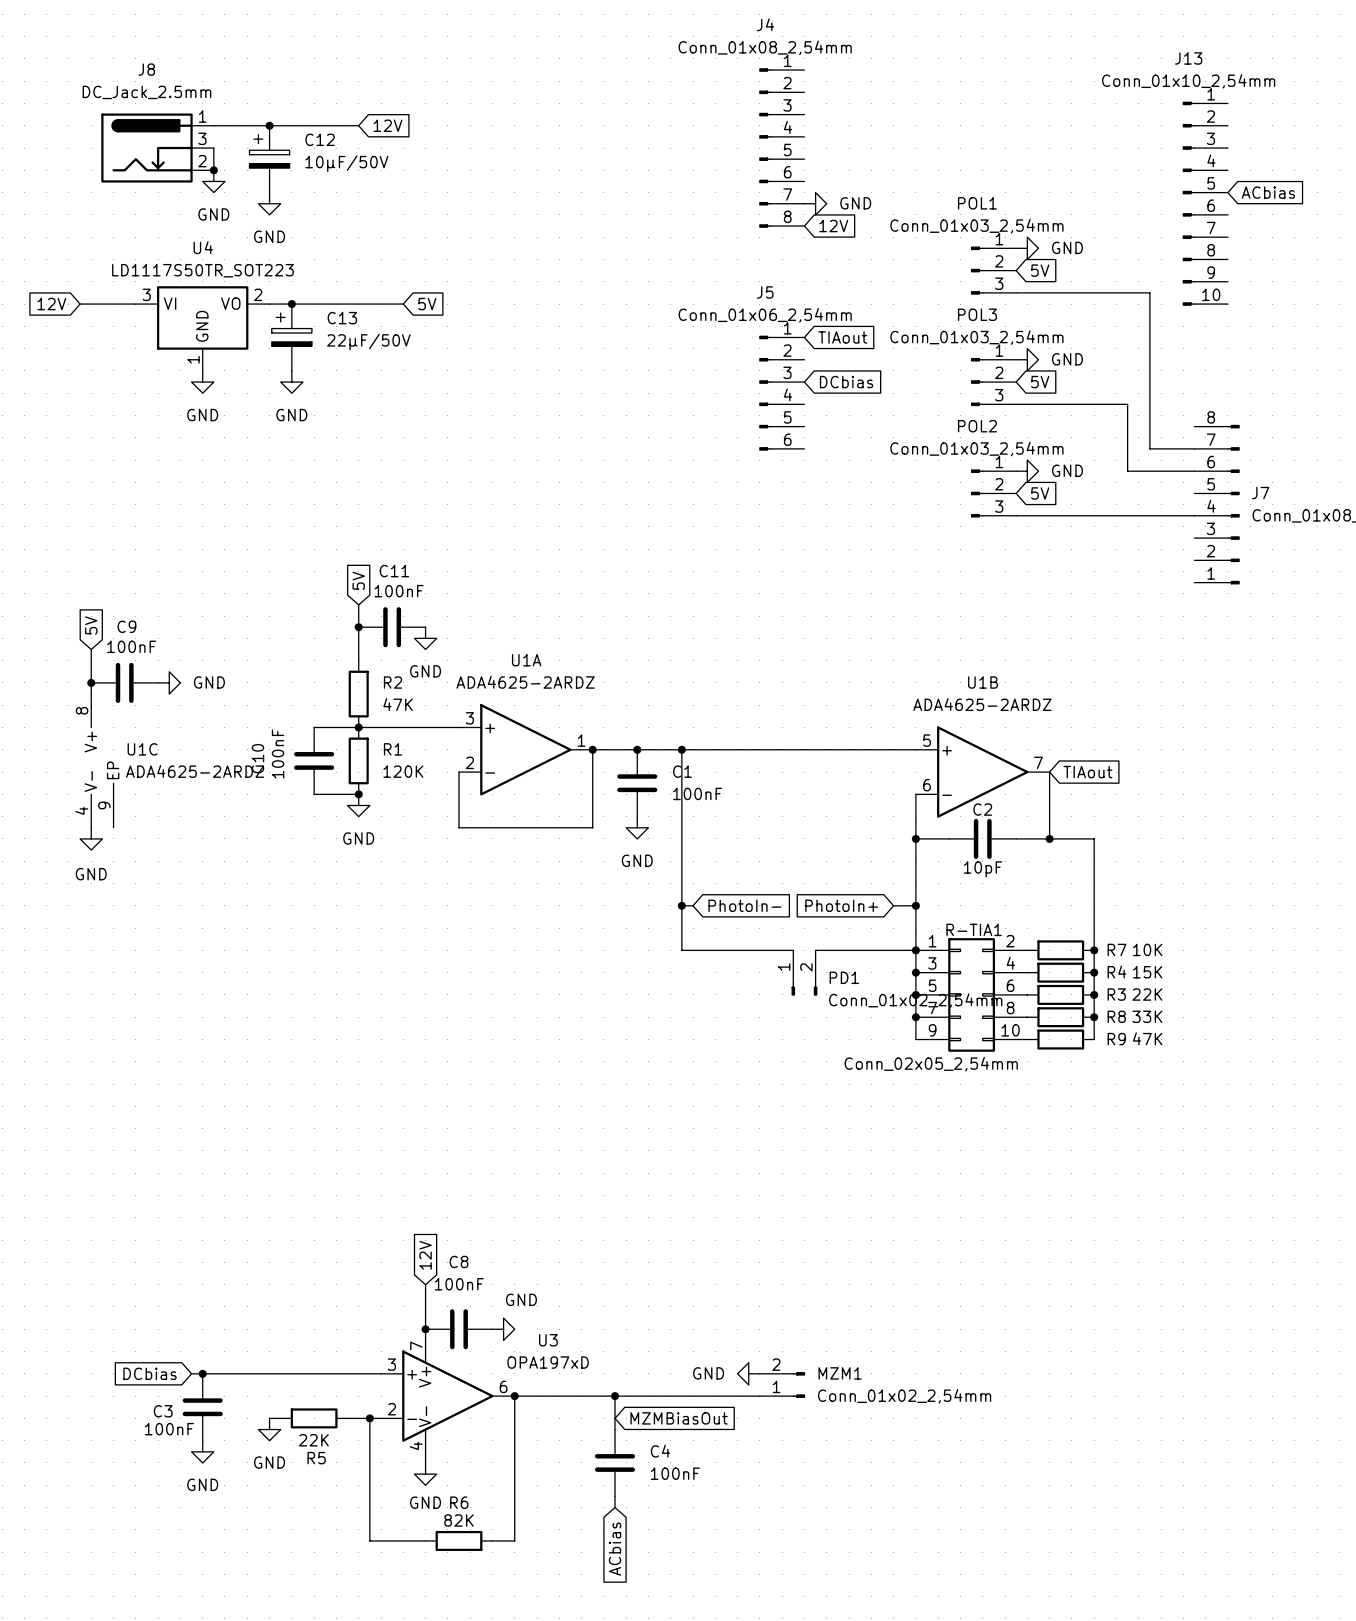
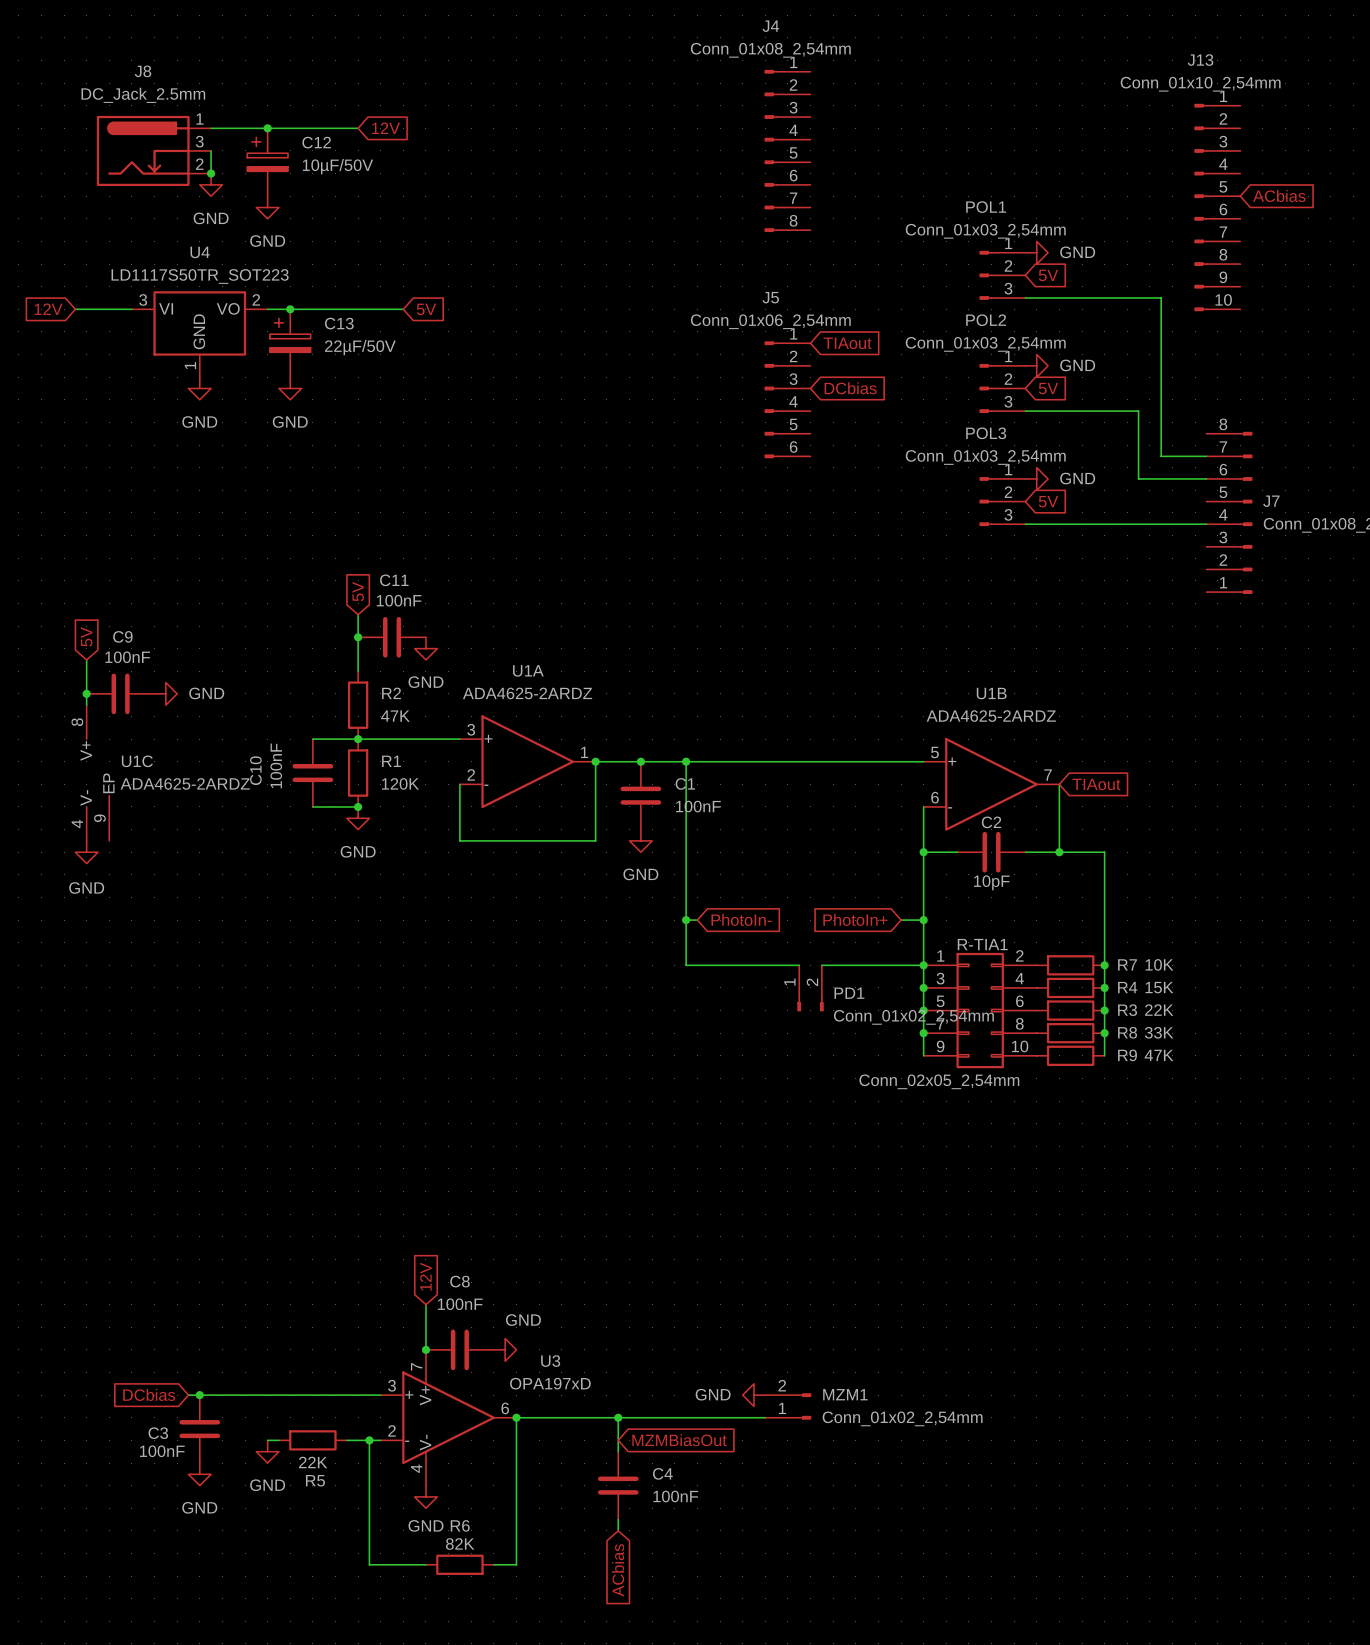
power symbol: GND (815, 203) -> none
global label: 12V (833, 226) -> none
POL3 name: POL3 (977, 314) -> POL2 (986, 320)
POL2 name: POL2 (977, 426) -> POL3 (986, 433)

